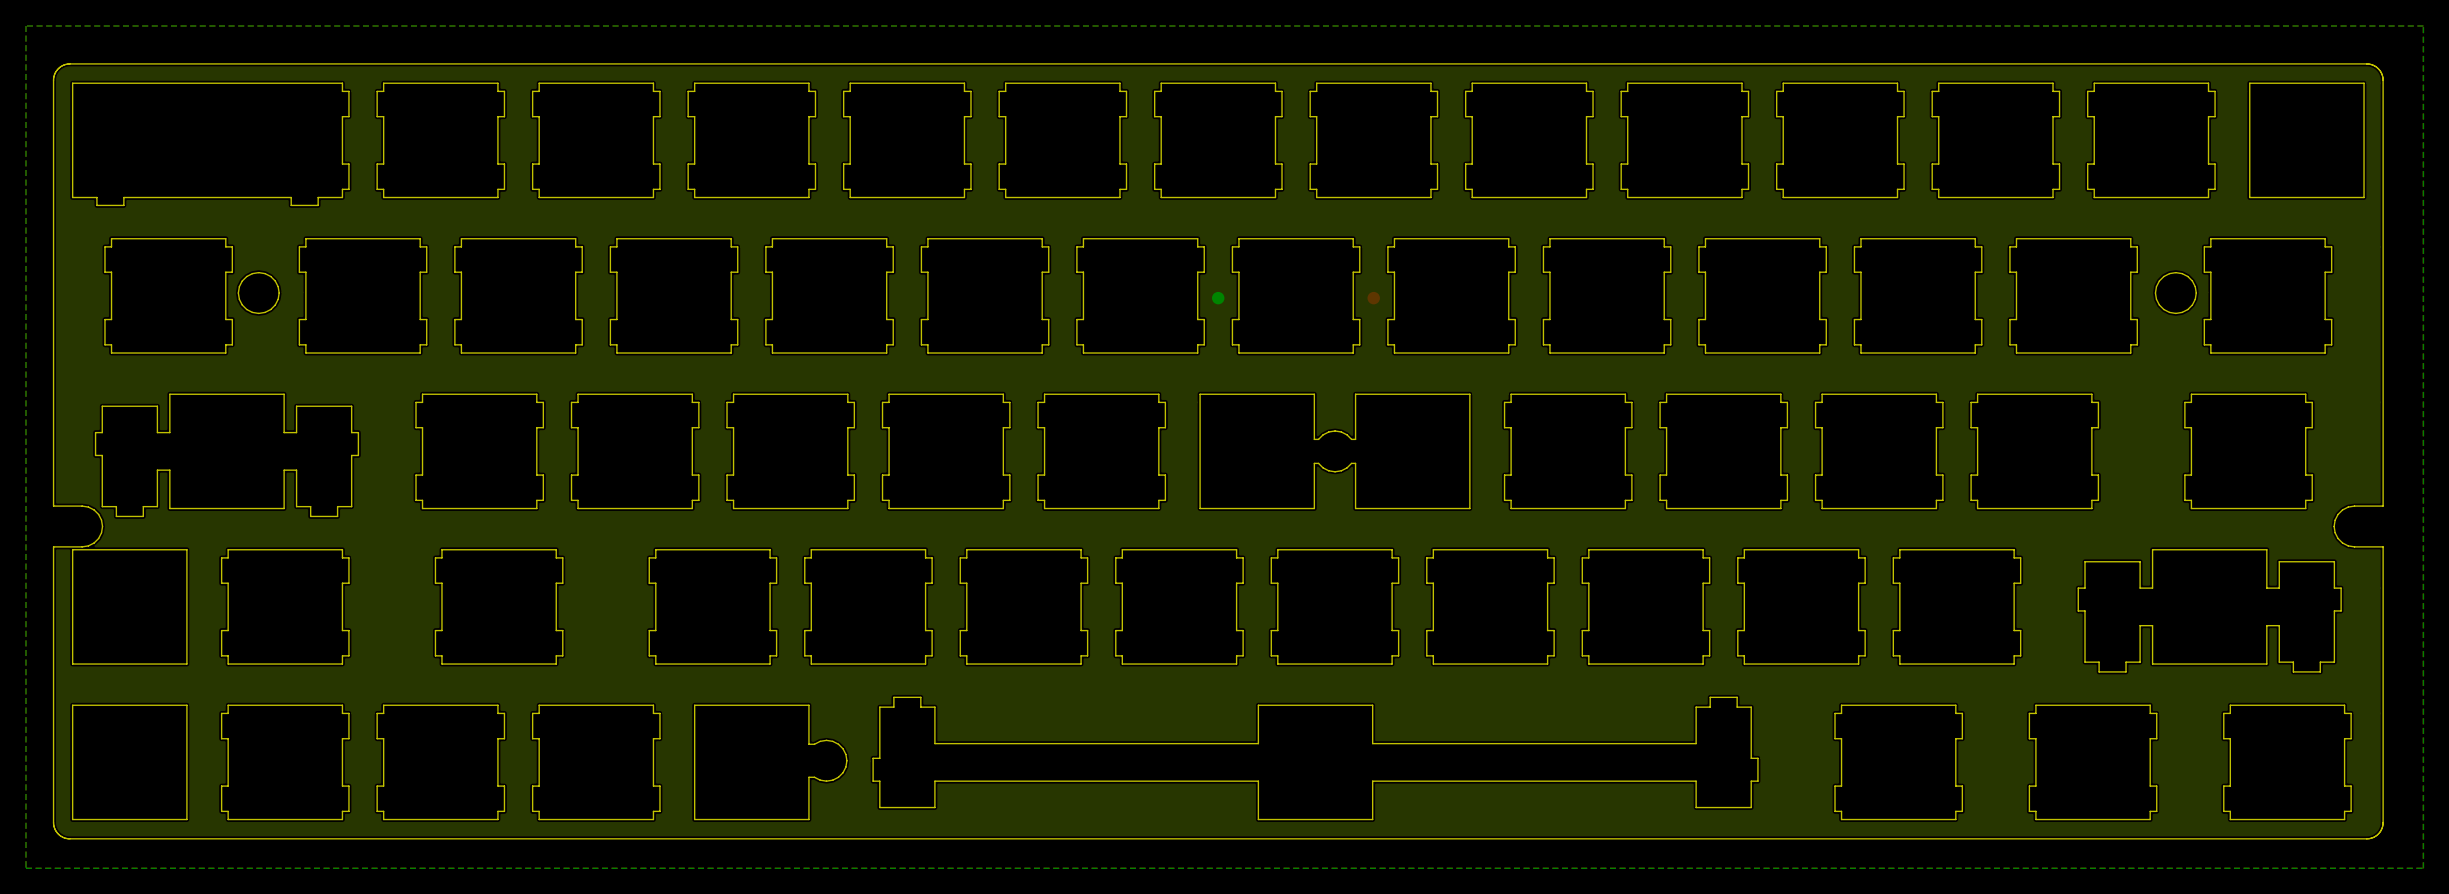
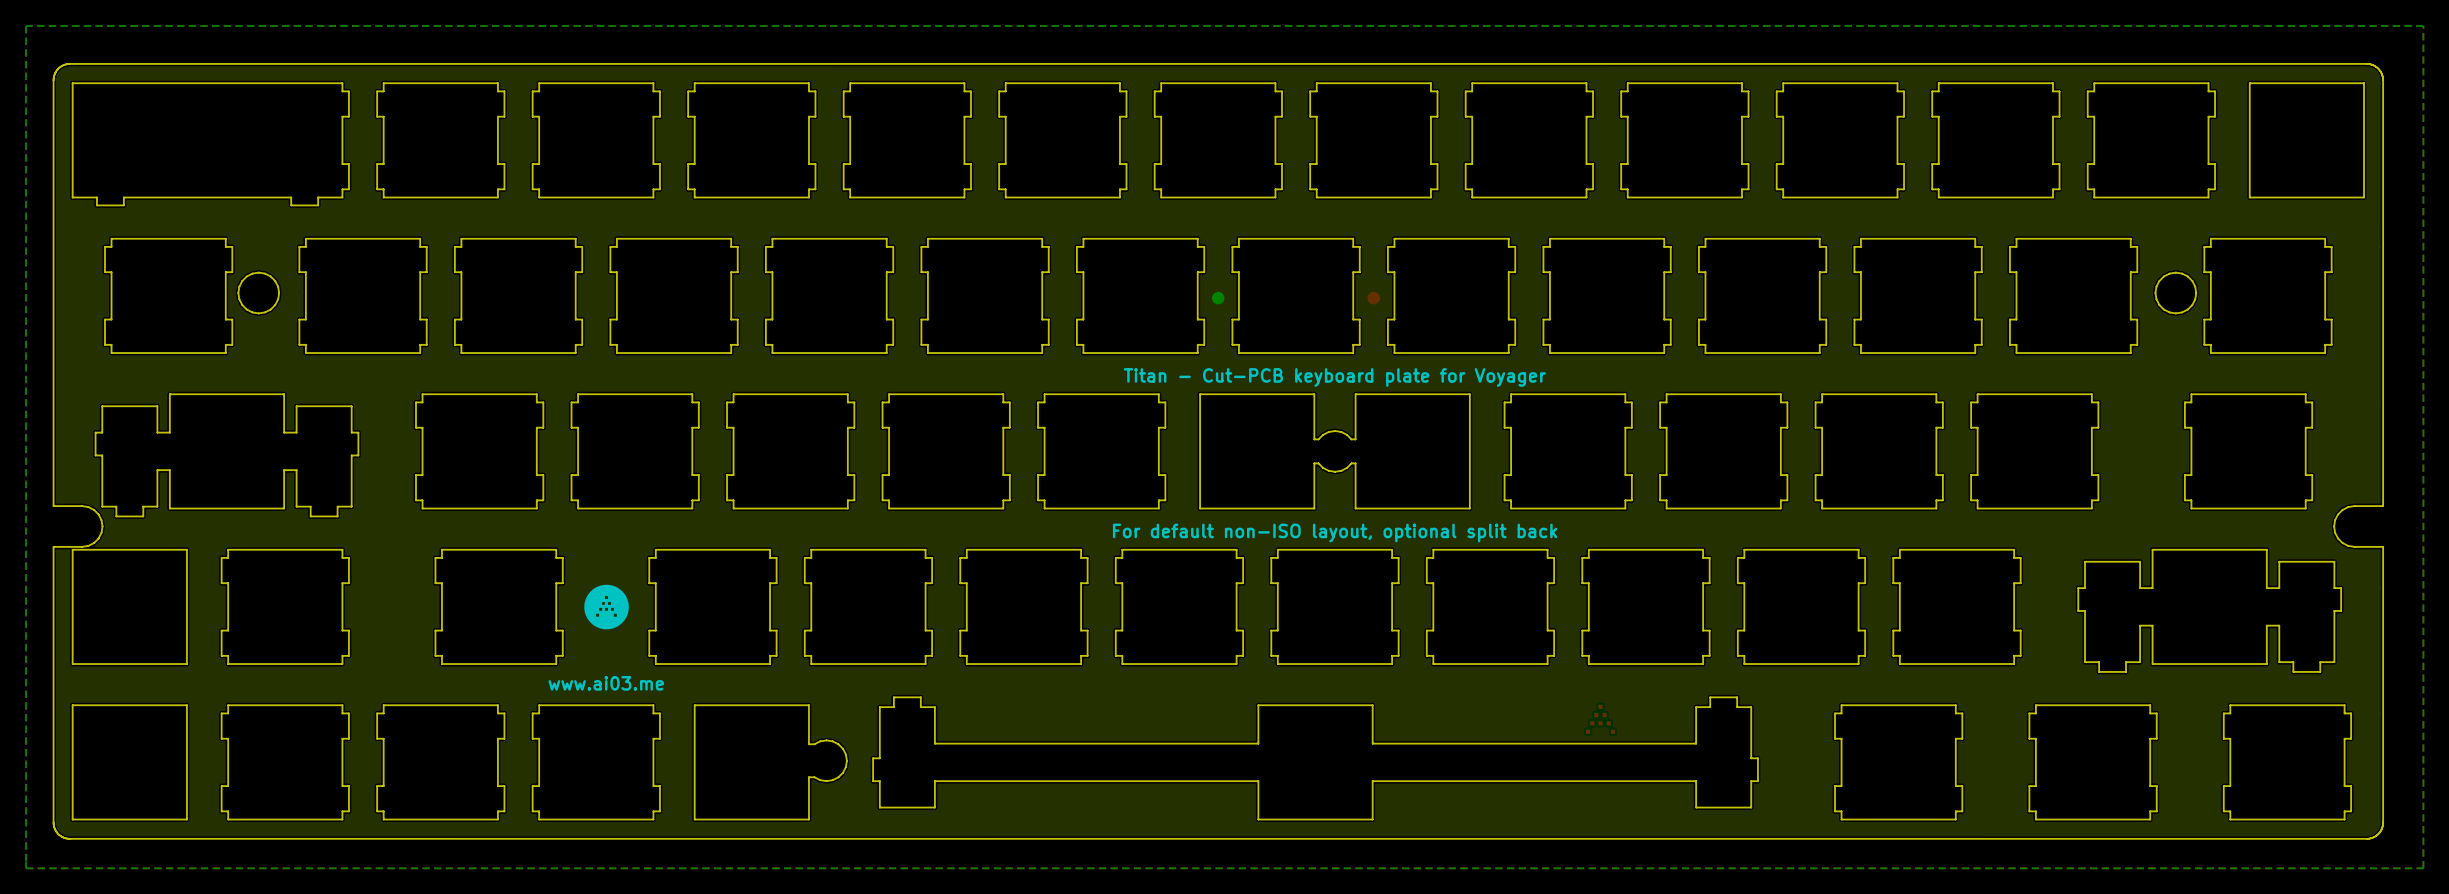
text: none -> Titan - Cut-PCB keyboard plate for Voyager (1334, 377)
text: none -> For default non-ISO layout, optional split back (1335, 532)
drawing: none -> [584, 584, 629, 630]
text: none -> www.ai03.me (606, 683)
part: none -> (1600, 719)

